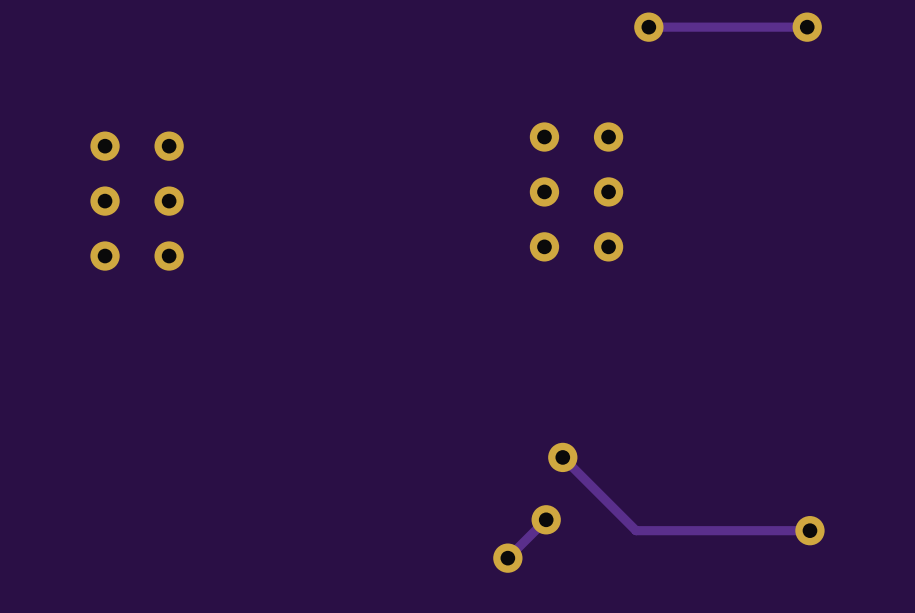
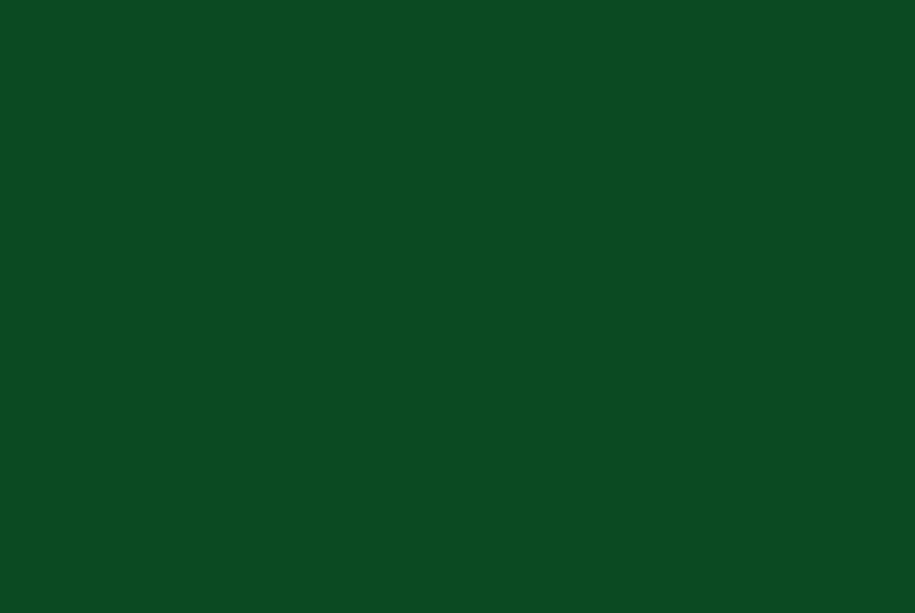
via: (648, 27) -> none
track: (807, 27) (648, 27) -> none
via: (807, 27) -> none
via: (544, 137) -> none
via: (608, 137) -> none
via: (105, 146) -> none
via: (169, 146) -> none
via: (544, 191) -> none
via: (608, 191) -> none
via: (105, 201) -> none
via: (169, 201) -> none
via: (544, 246) -> none
via: (608, 246) -> none
via: (105, 256) -> none
via: (169, 256) -> none
track: (562, 457) (636, 530) (809, 530) -> none
via: (562, 457) -> none
track: (546, 519) (507, 558) -> none
via: (546, 519) -> none
via: (809, 530) -> none
via: (507, 558) -> none

